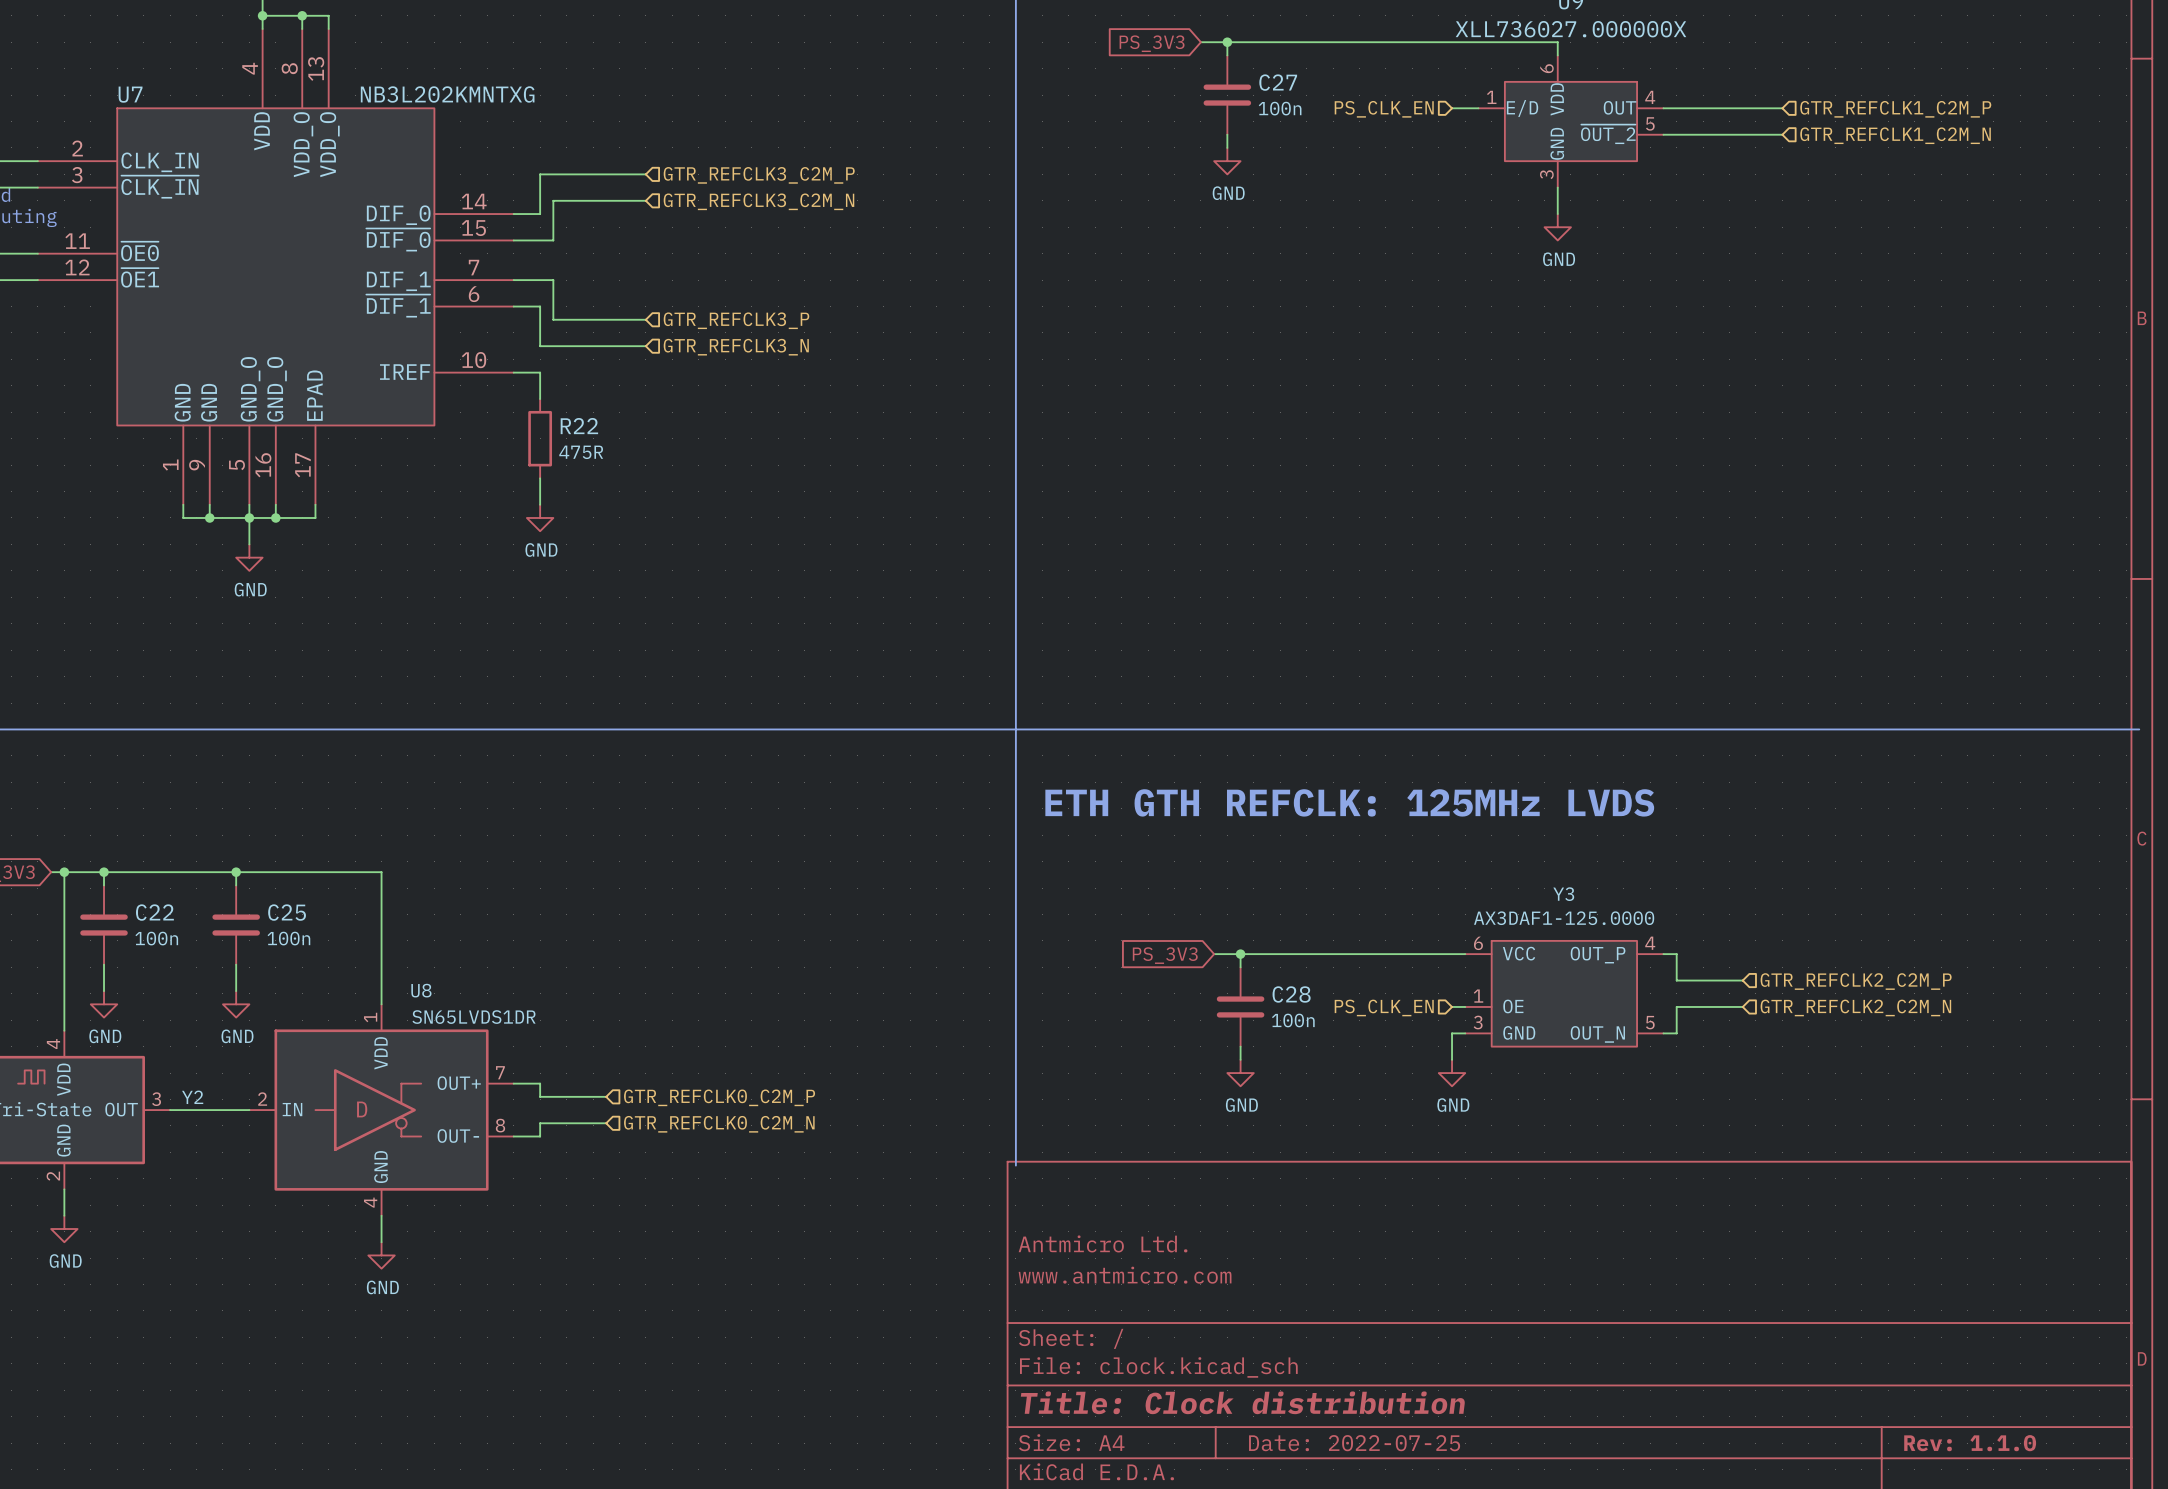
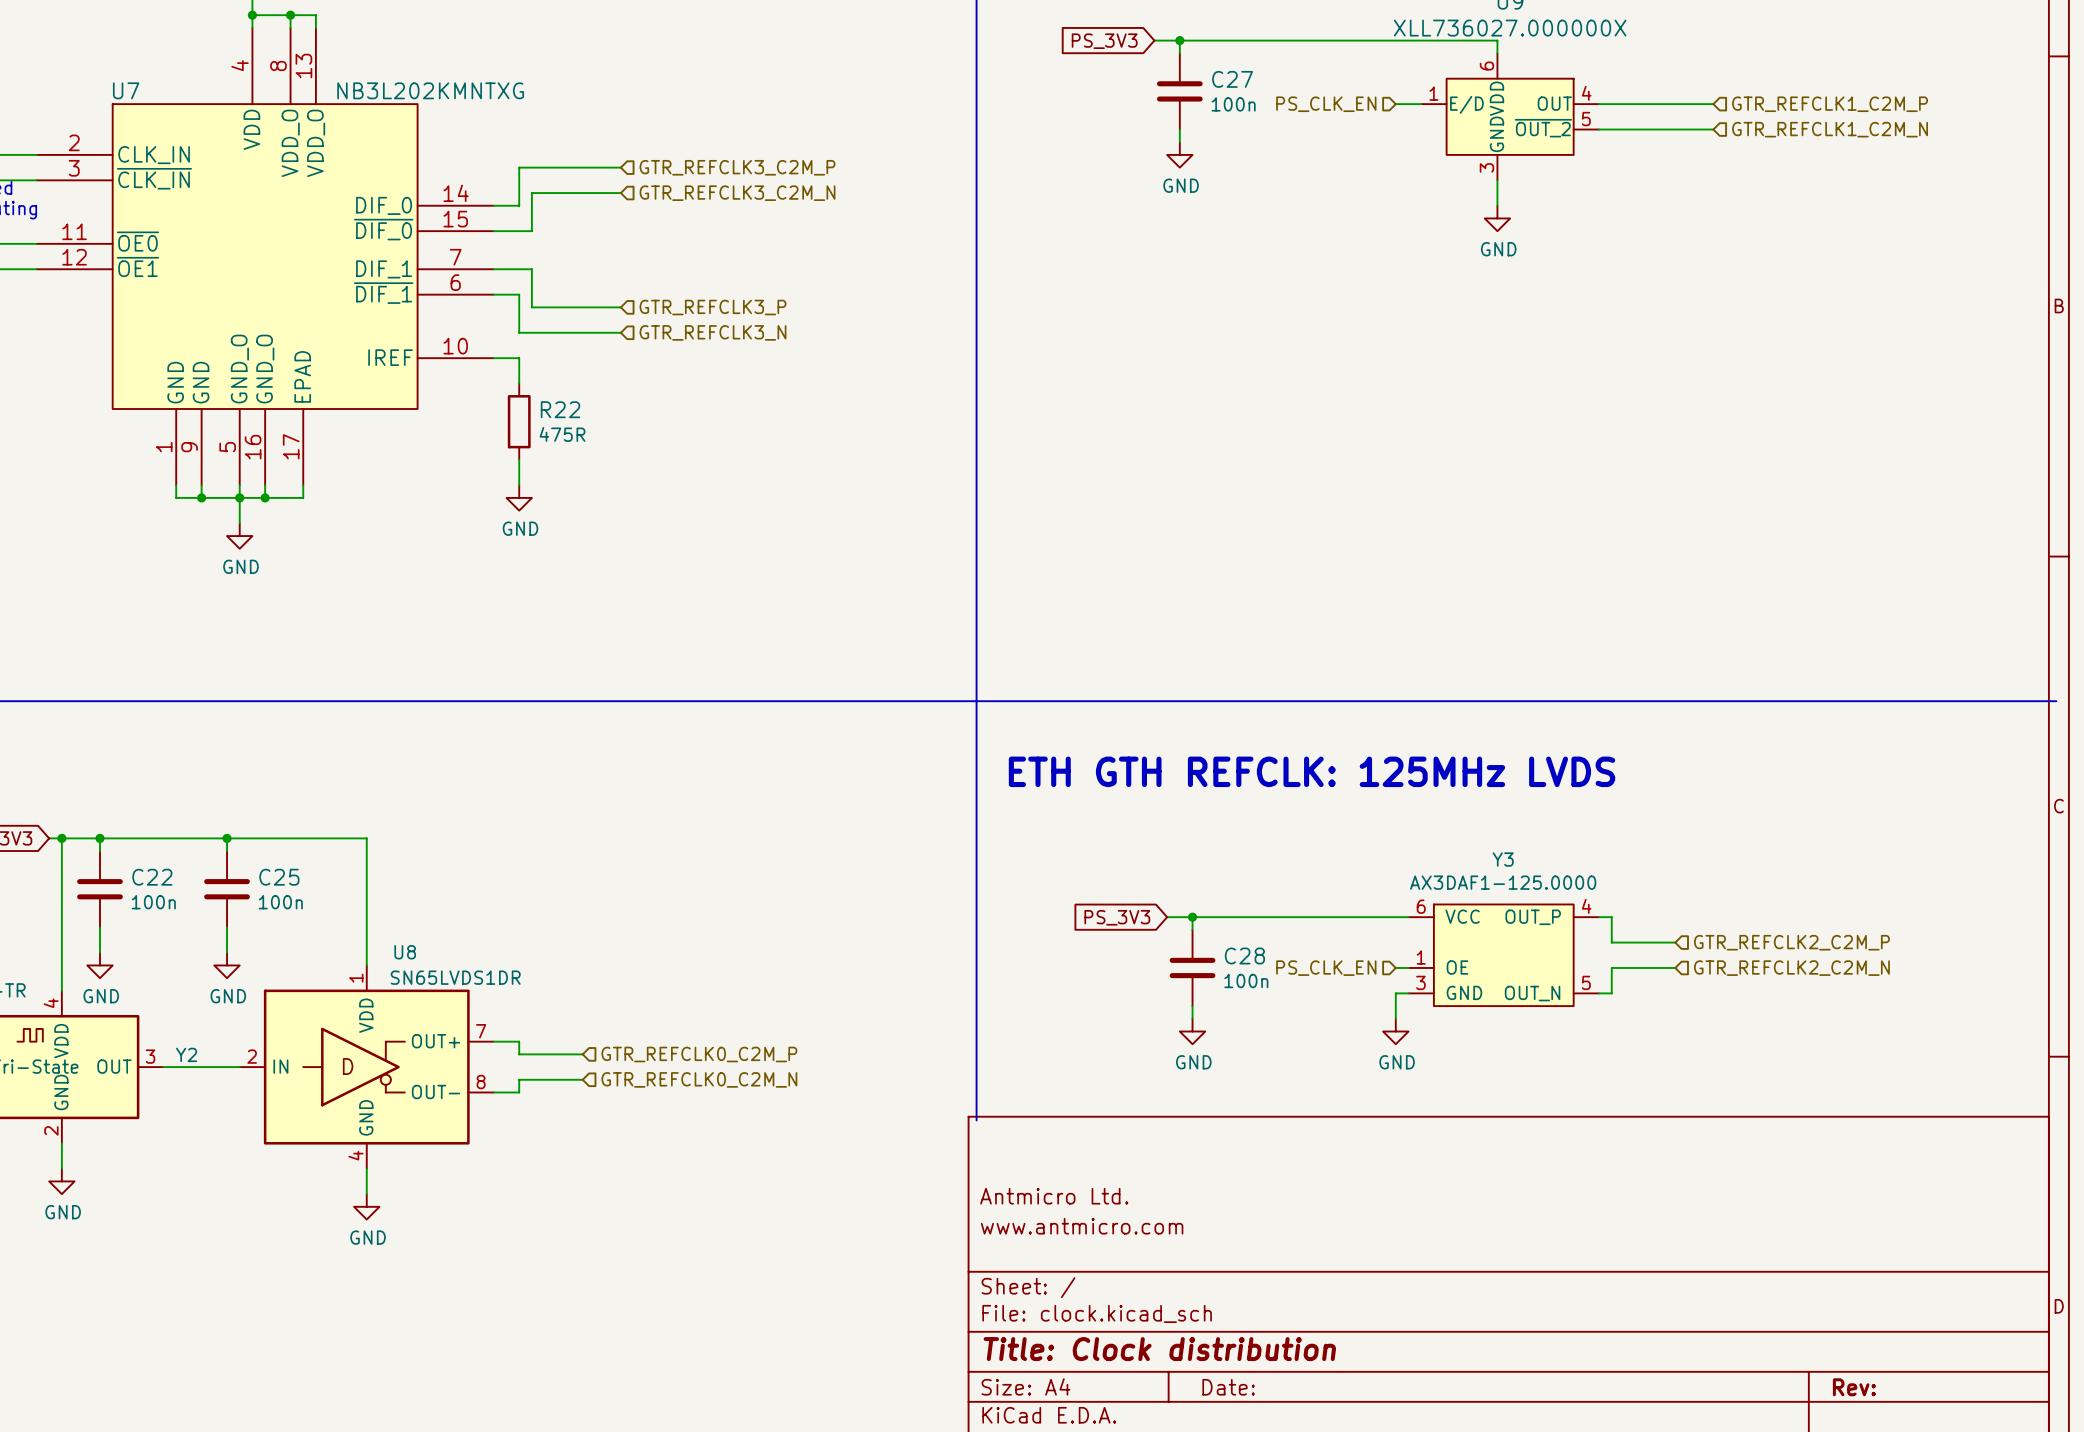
title block: Date: 2022-07-25 (1354, 1443) -> Date: (1228, 1387)
title block: Rev: 1.1.0 (1970, 1443) -> Rev: (1854, 1387)

